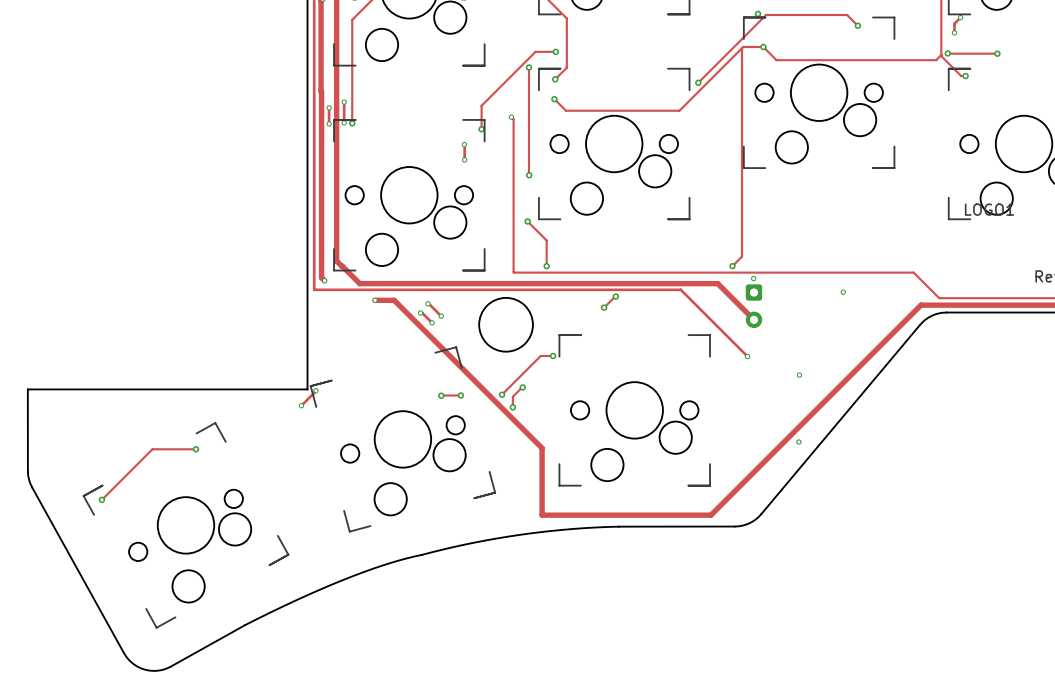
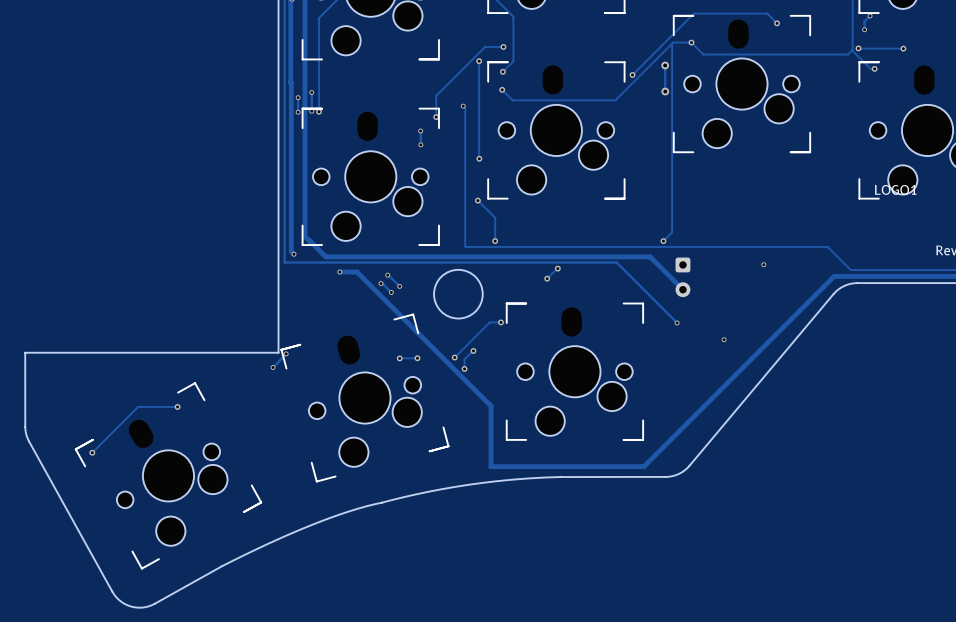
via: (758, 13) -> none
track: none -> (665, 65) (665, 91)
via: none -> (665, 65)
via: none -> (665, 91)
via: (753, 278) -> none
via: (798, 442) -> none

